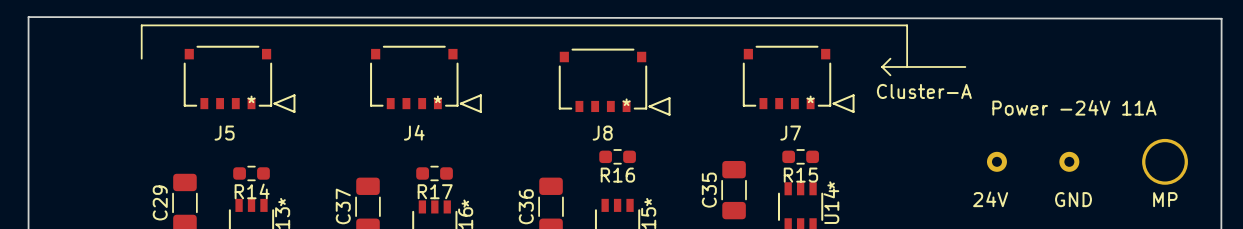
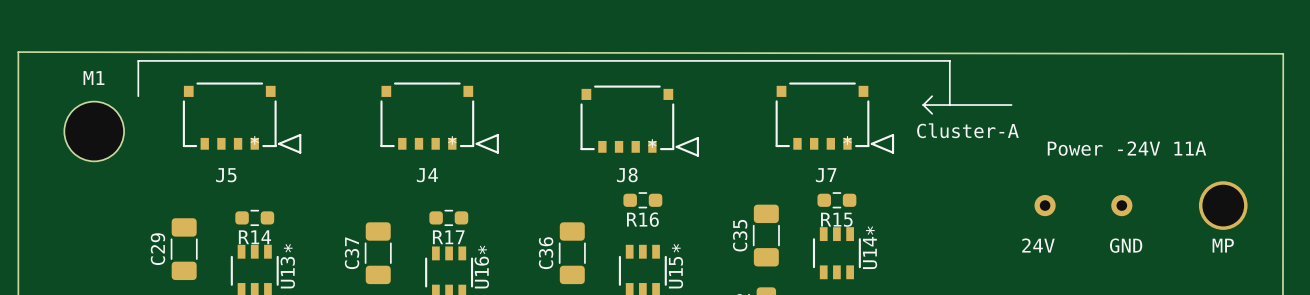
M1: none -> (94, 131)

